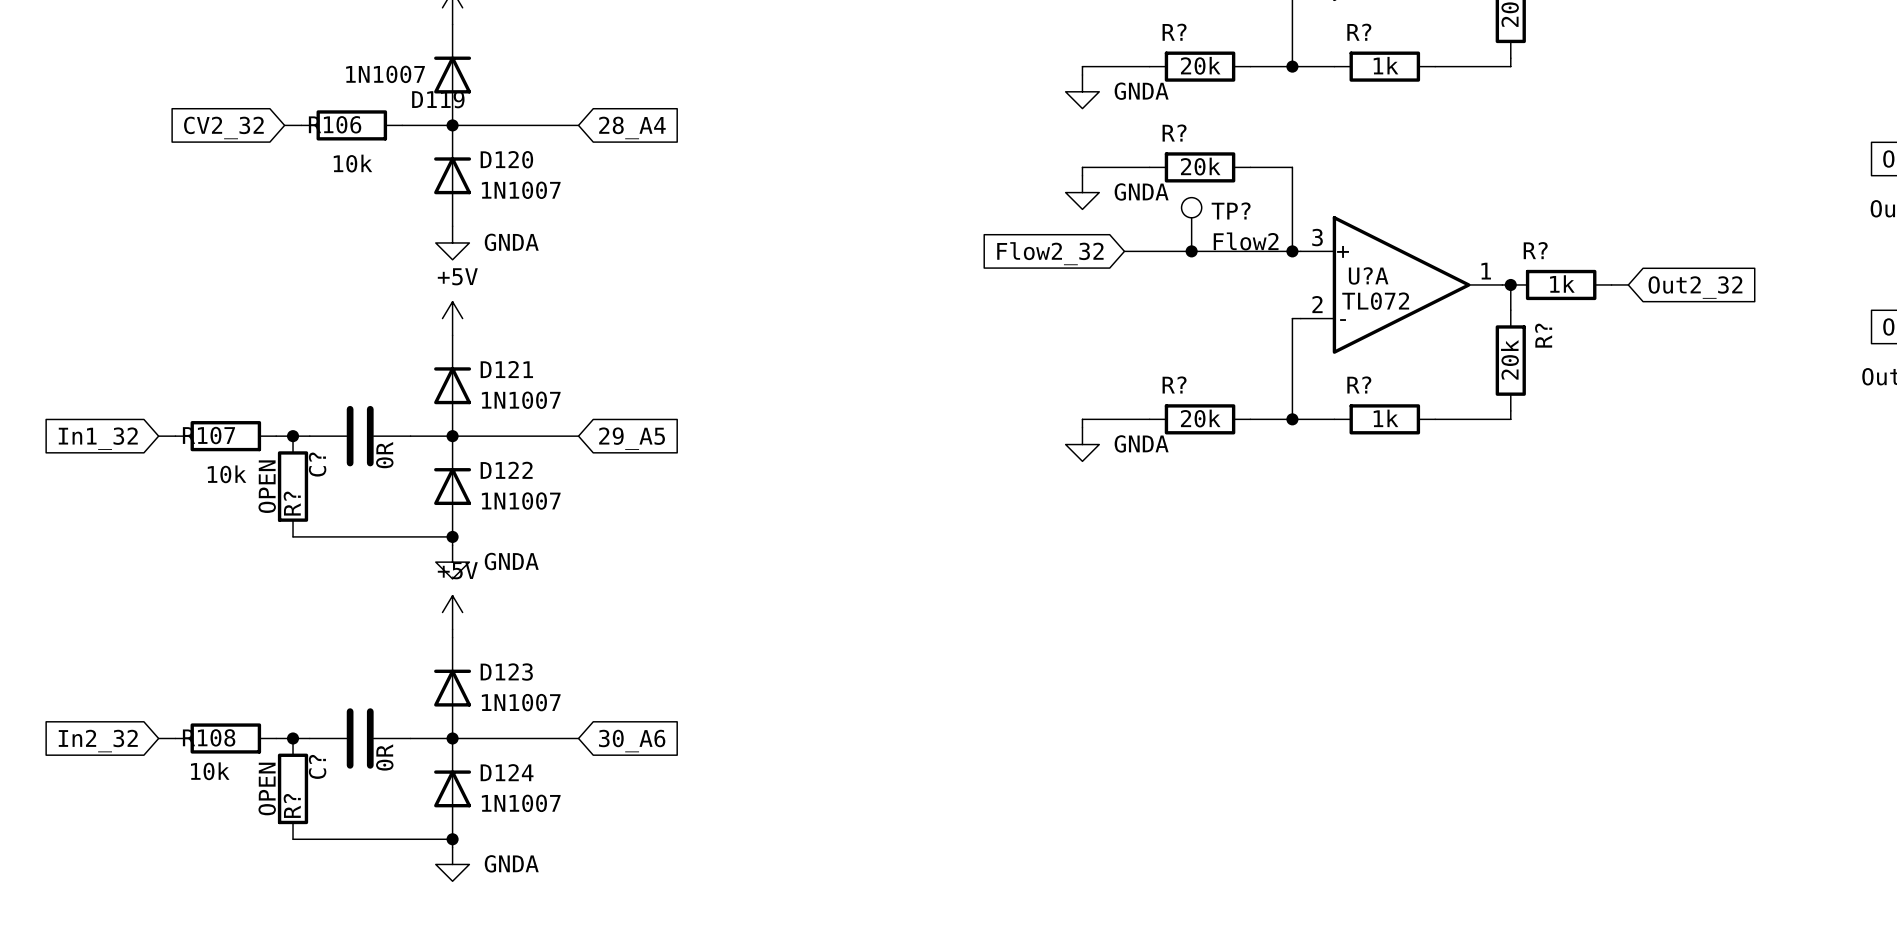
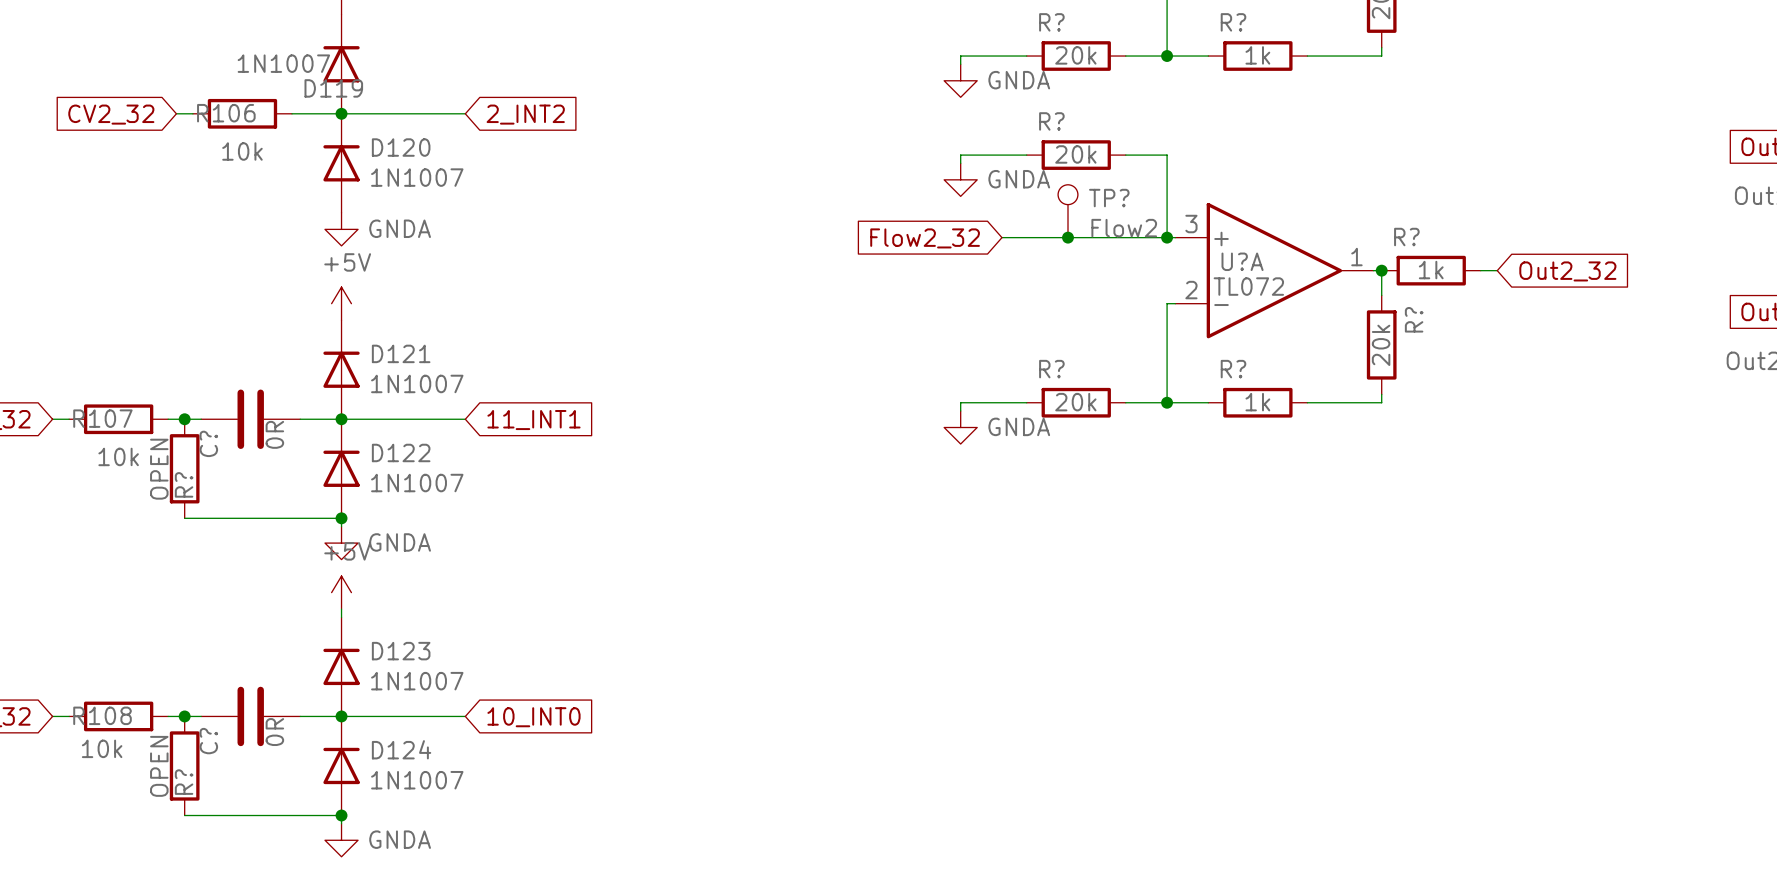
global label: 28_A4 (632, 127) -> 2_INT2 (525, 114)
global label: 29_A5 (632, 438) -> 11_INT1 (533, 420)
global label: 30_A6 (632, 741) -> 10_INT0 (533, 717)

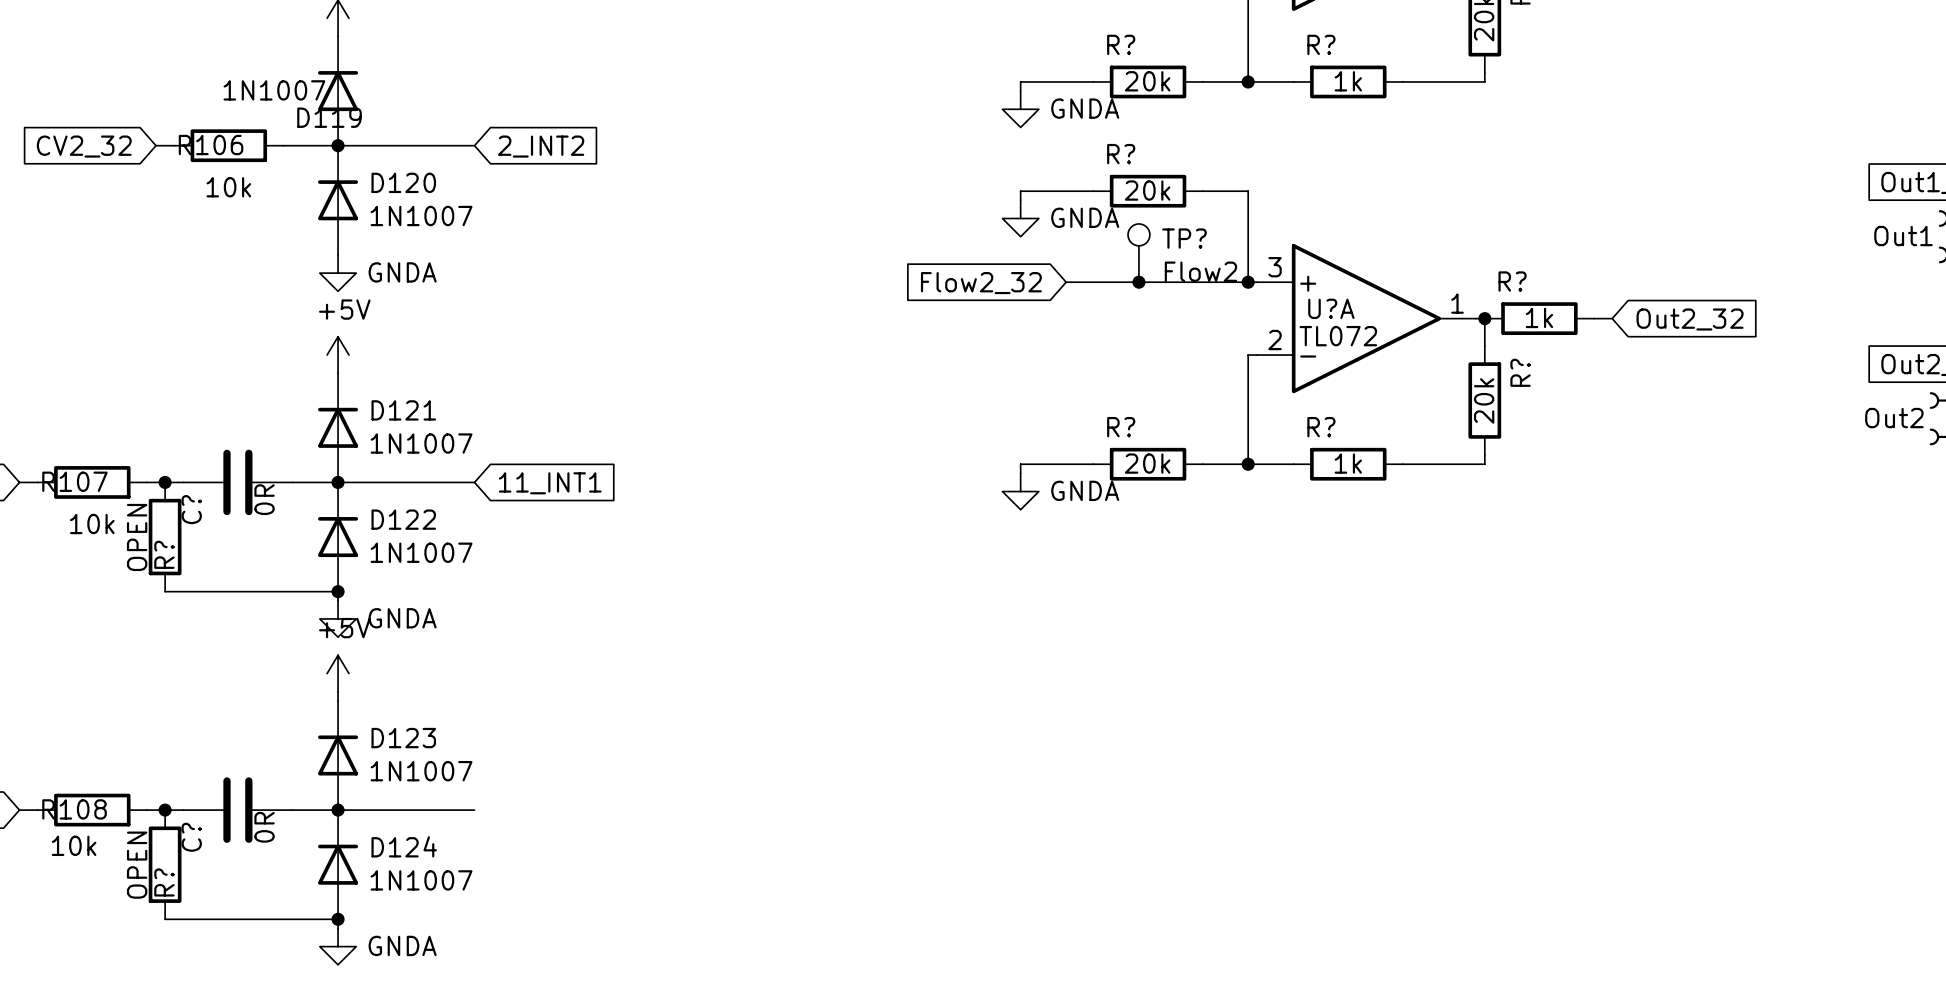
global label: 10_INT0 (533, 717) -> none

